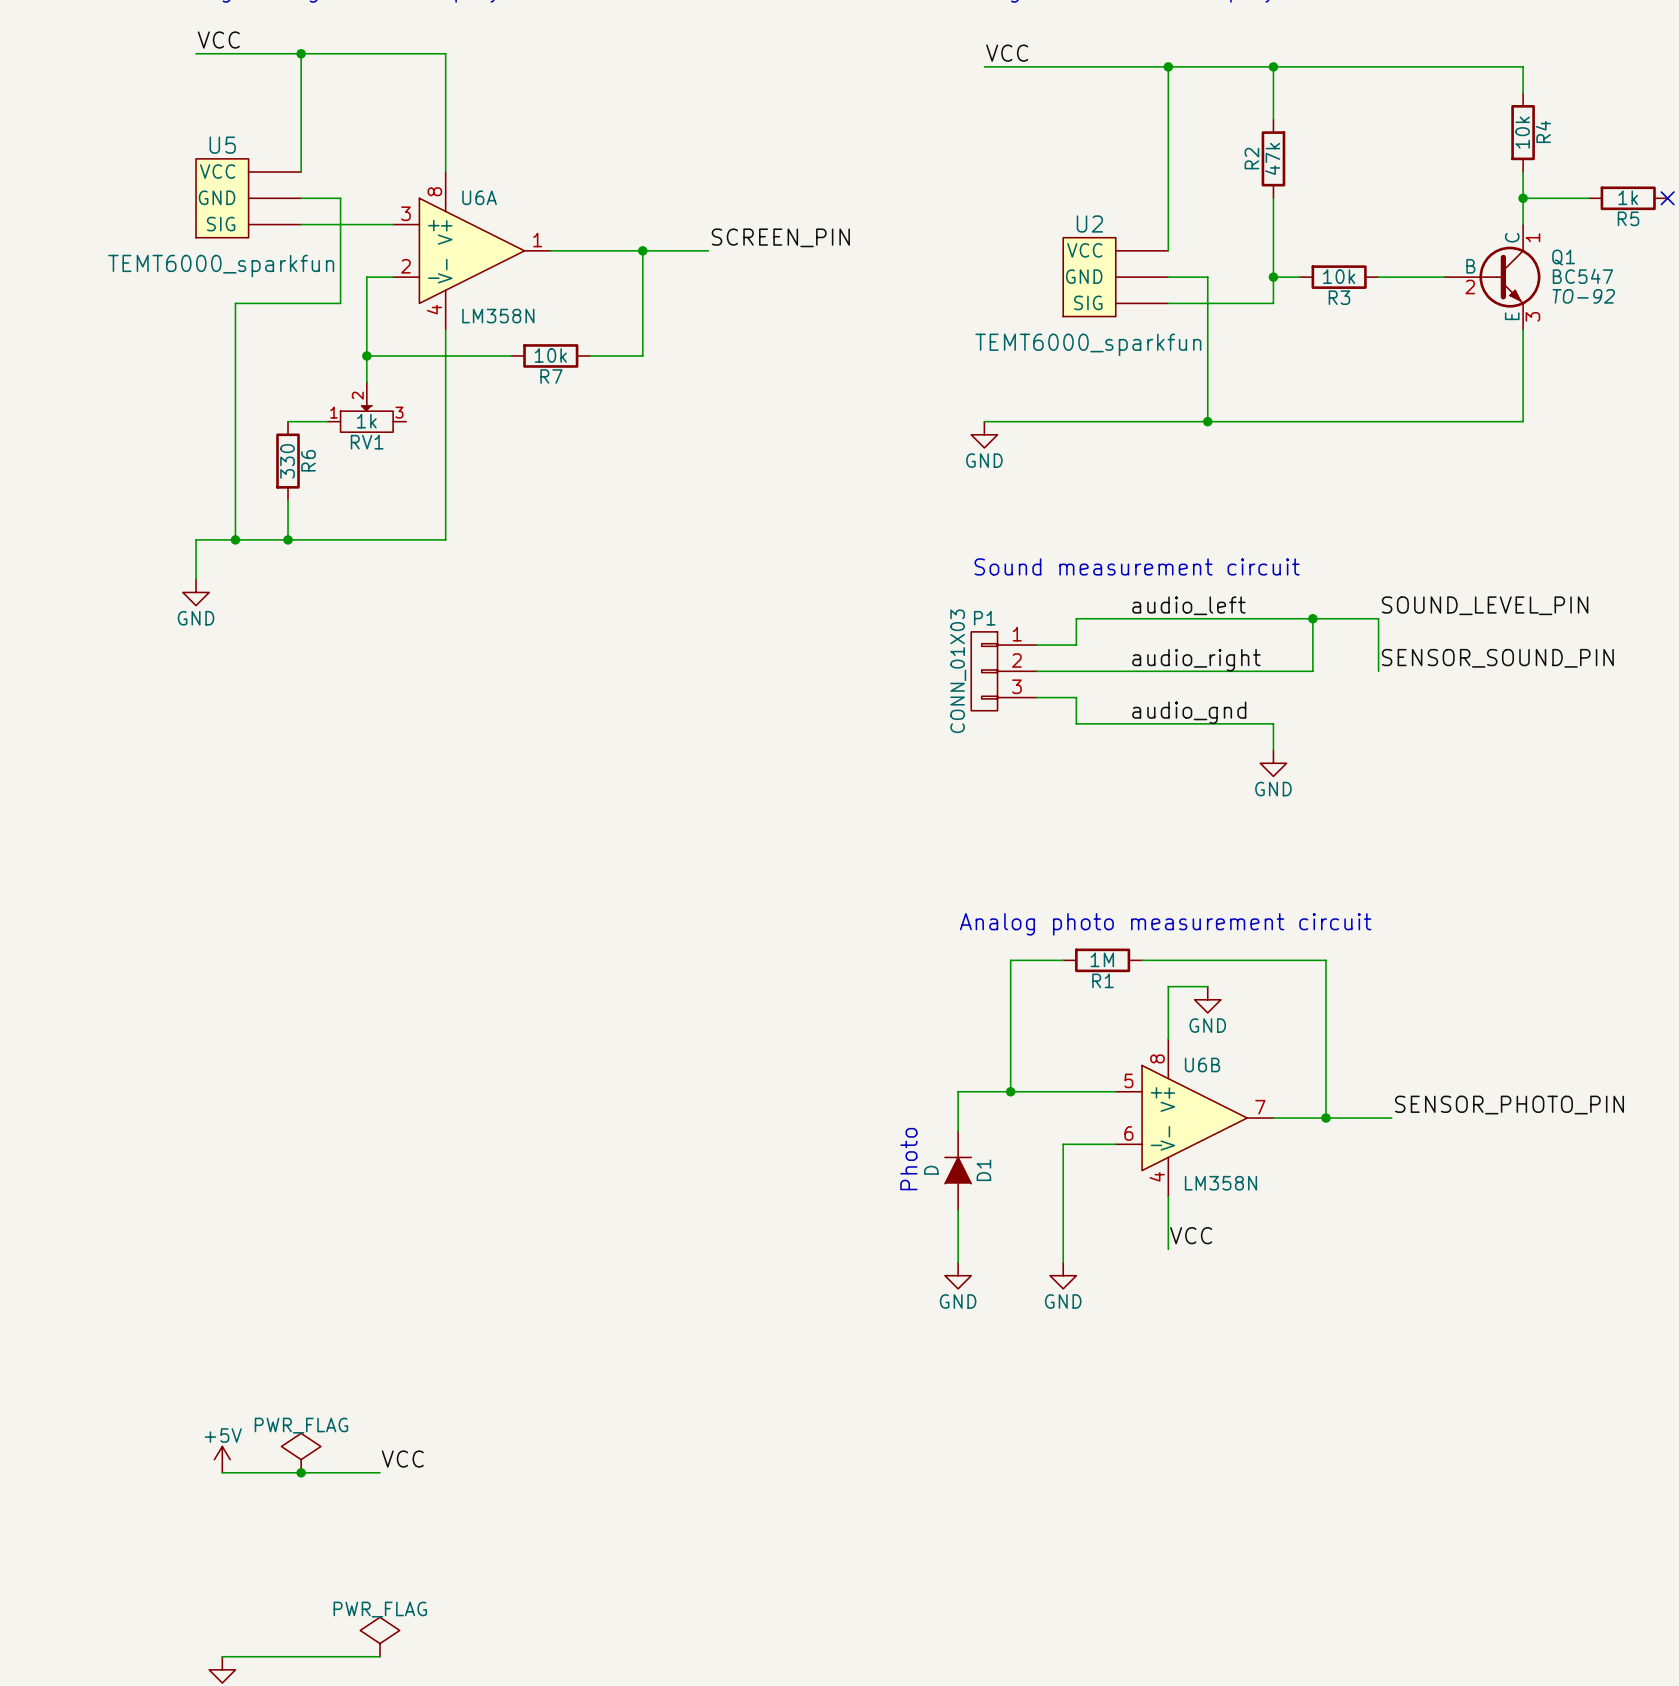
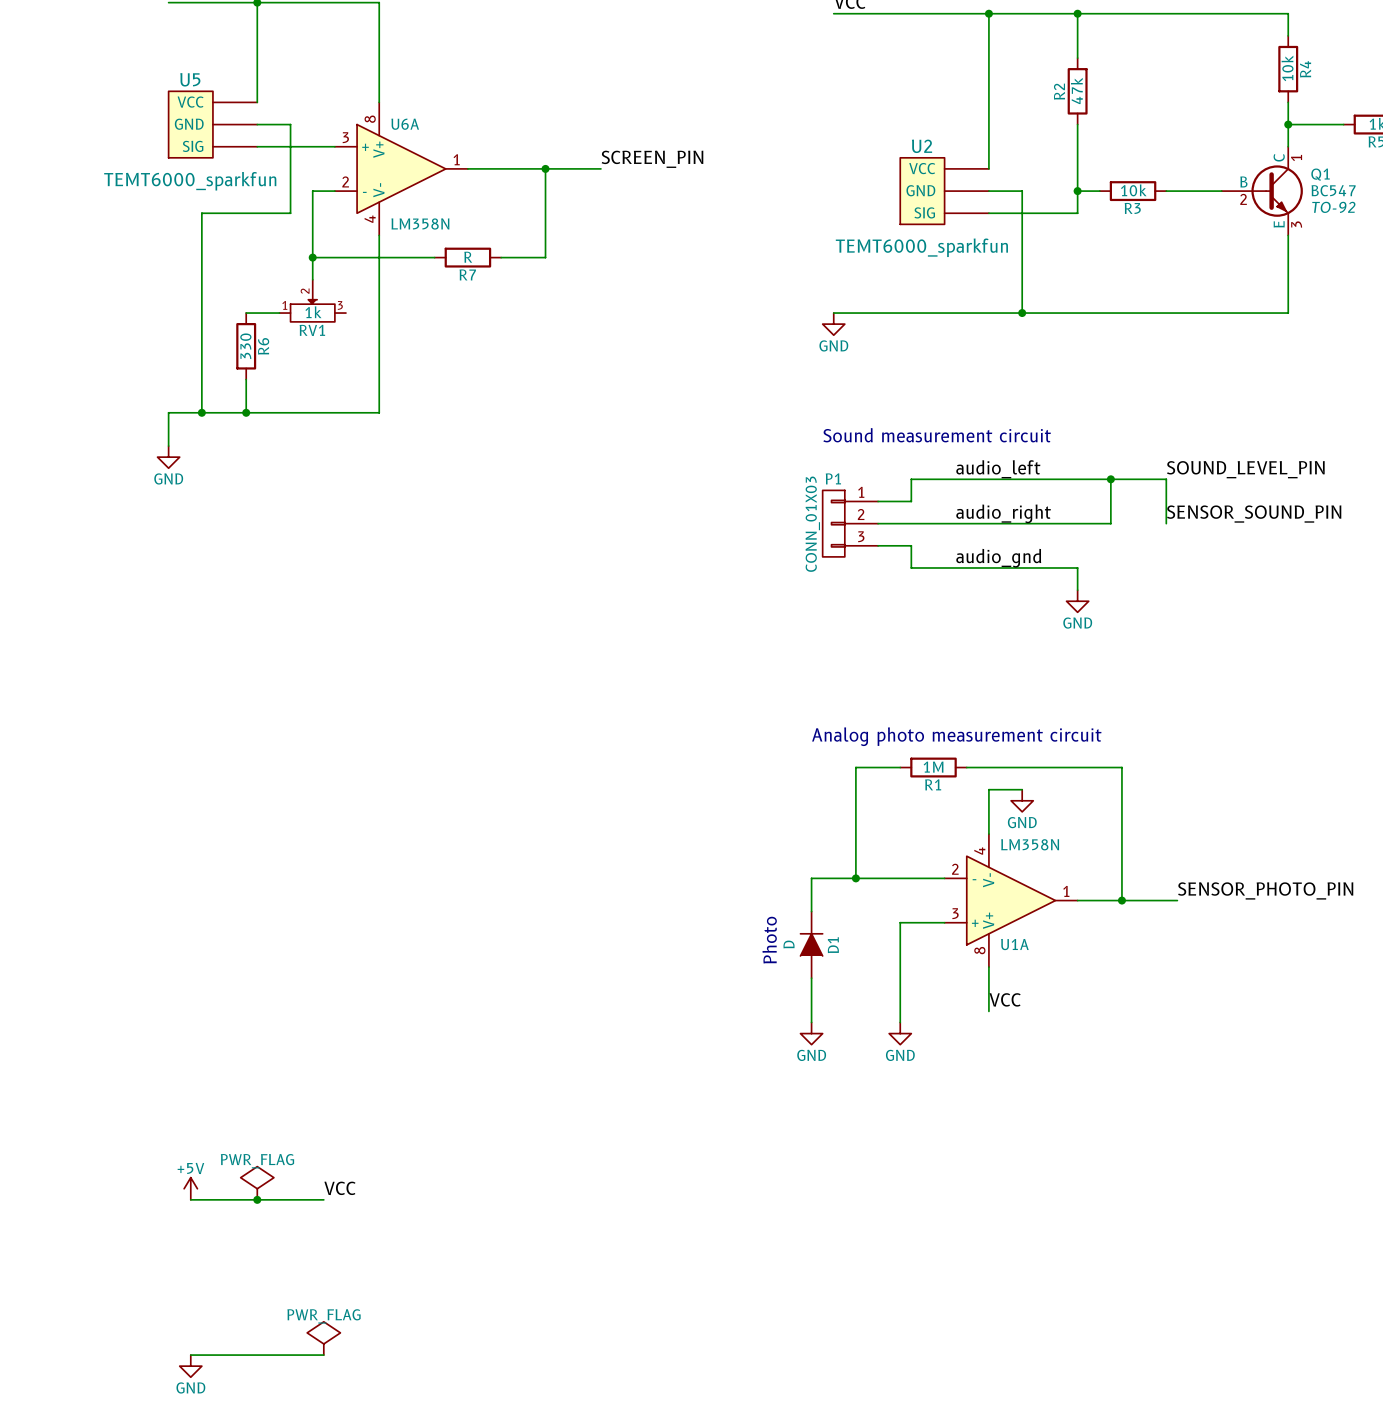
R7 value: 10k (550, 355) -> R (468, 257)
U6B symbol: [1115, 1039, 1274, 1197] -> [944, 834, 1078, 968]
U6B name: U6B (1202, 1064) -> U1A (1014, 944)
U6B value position: LM358N (1220, 1183) -> LM358N (1030, 844)

